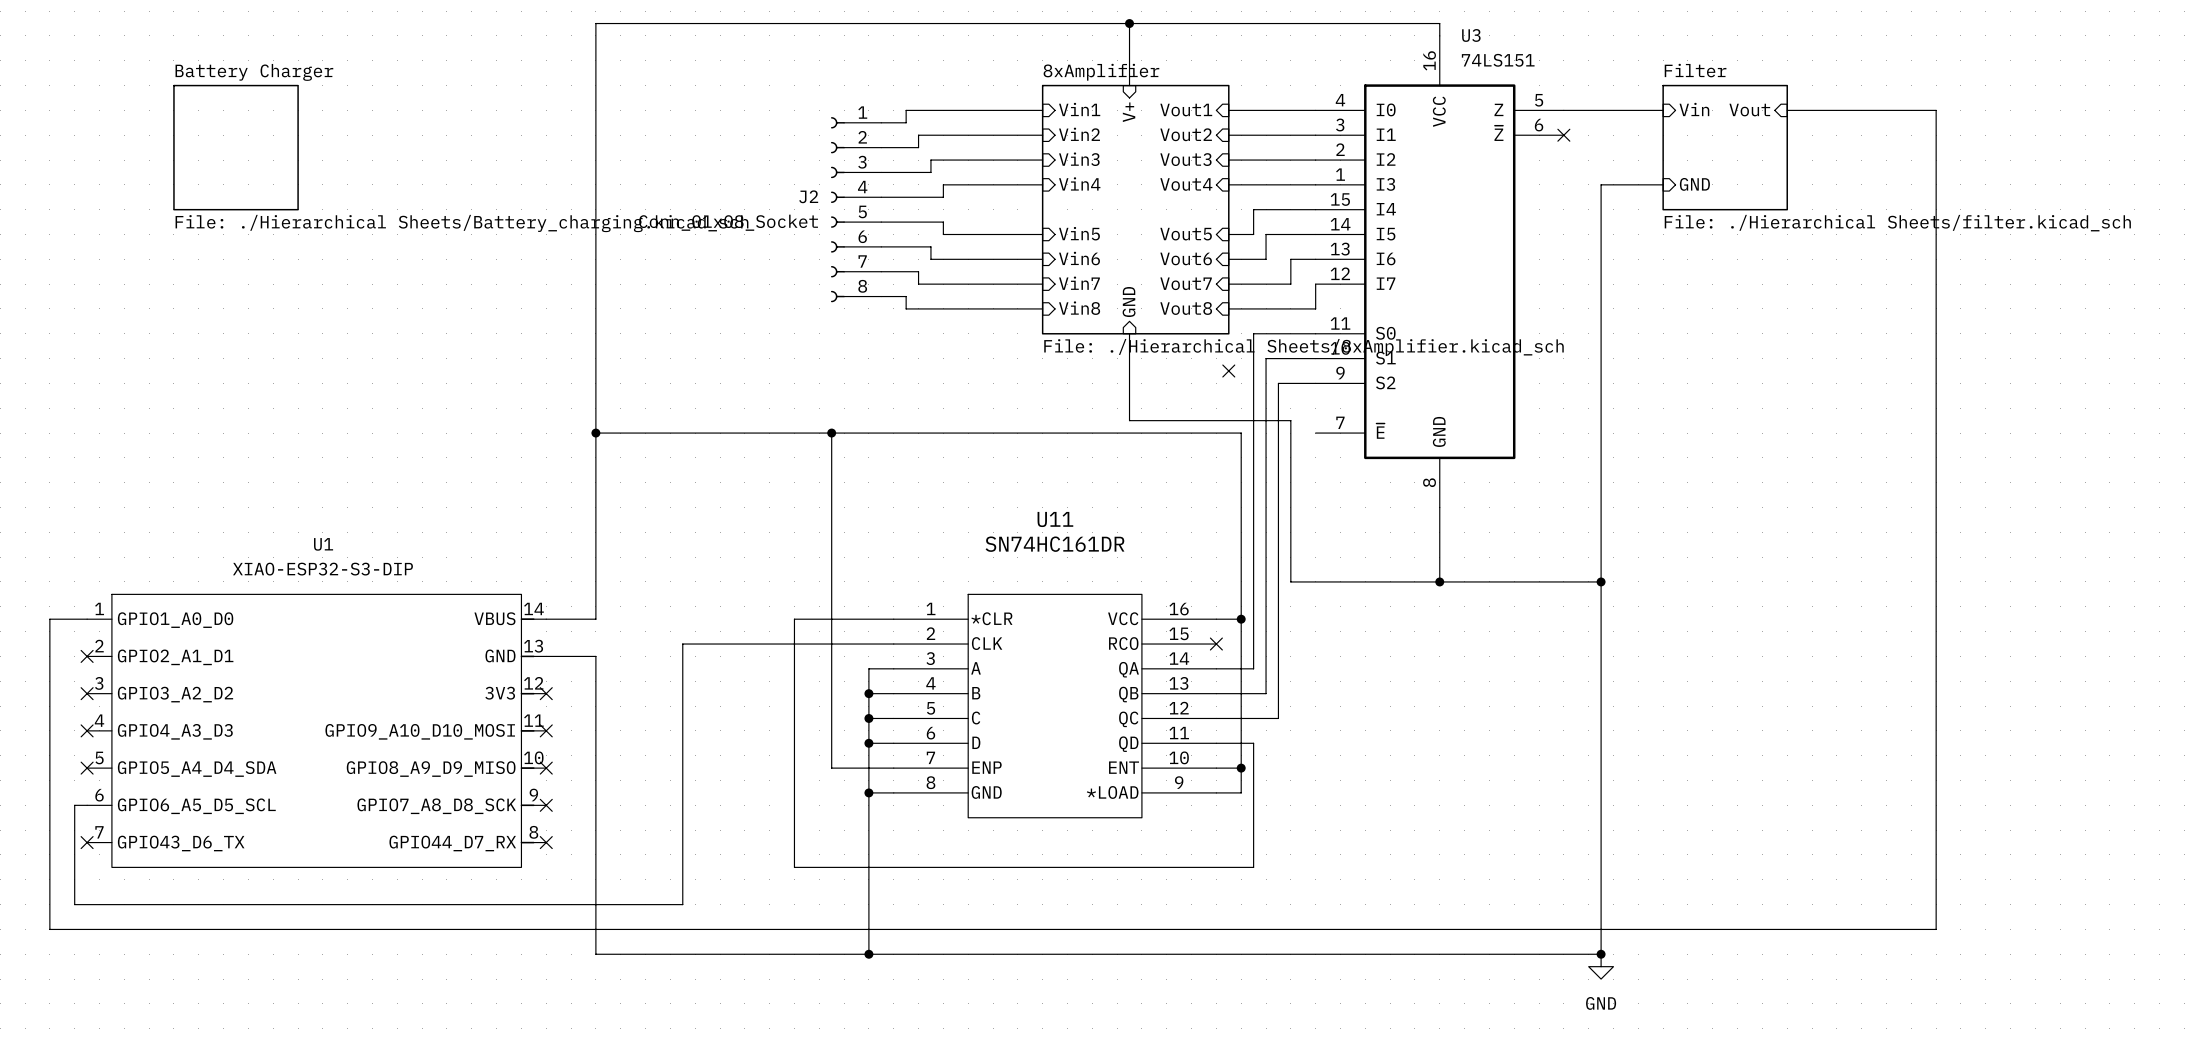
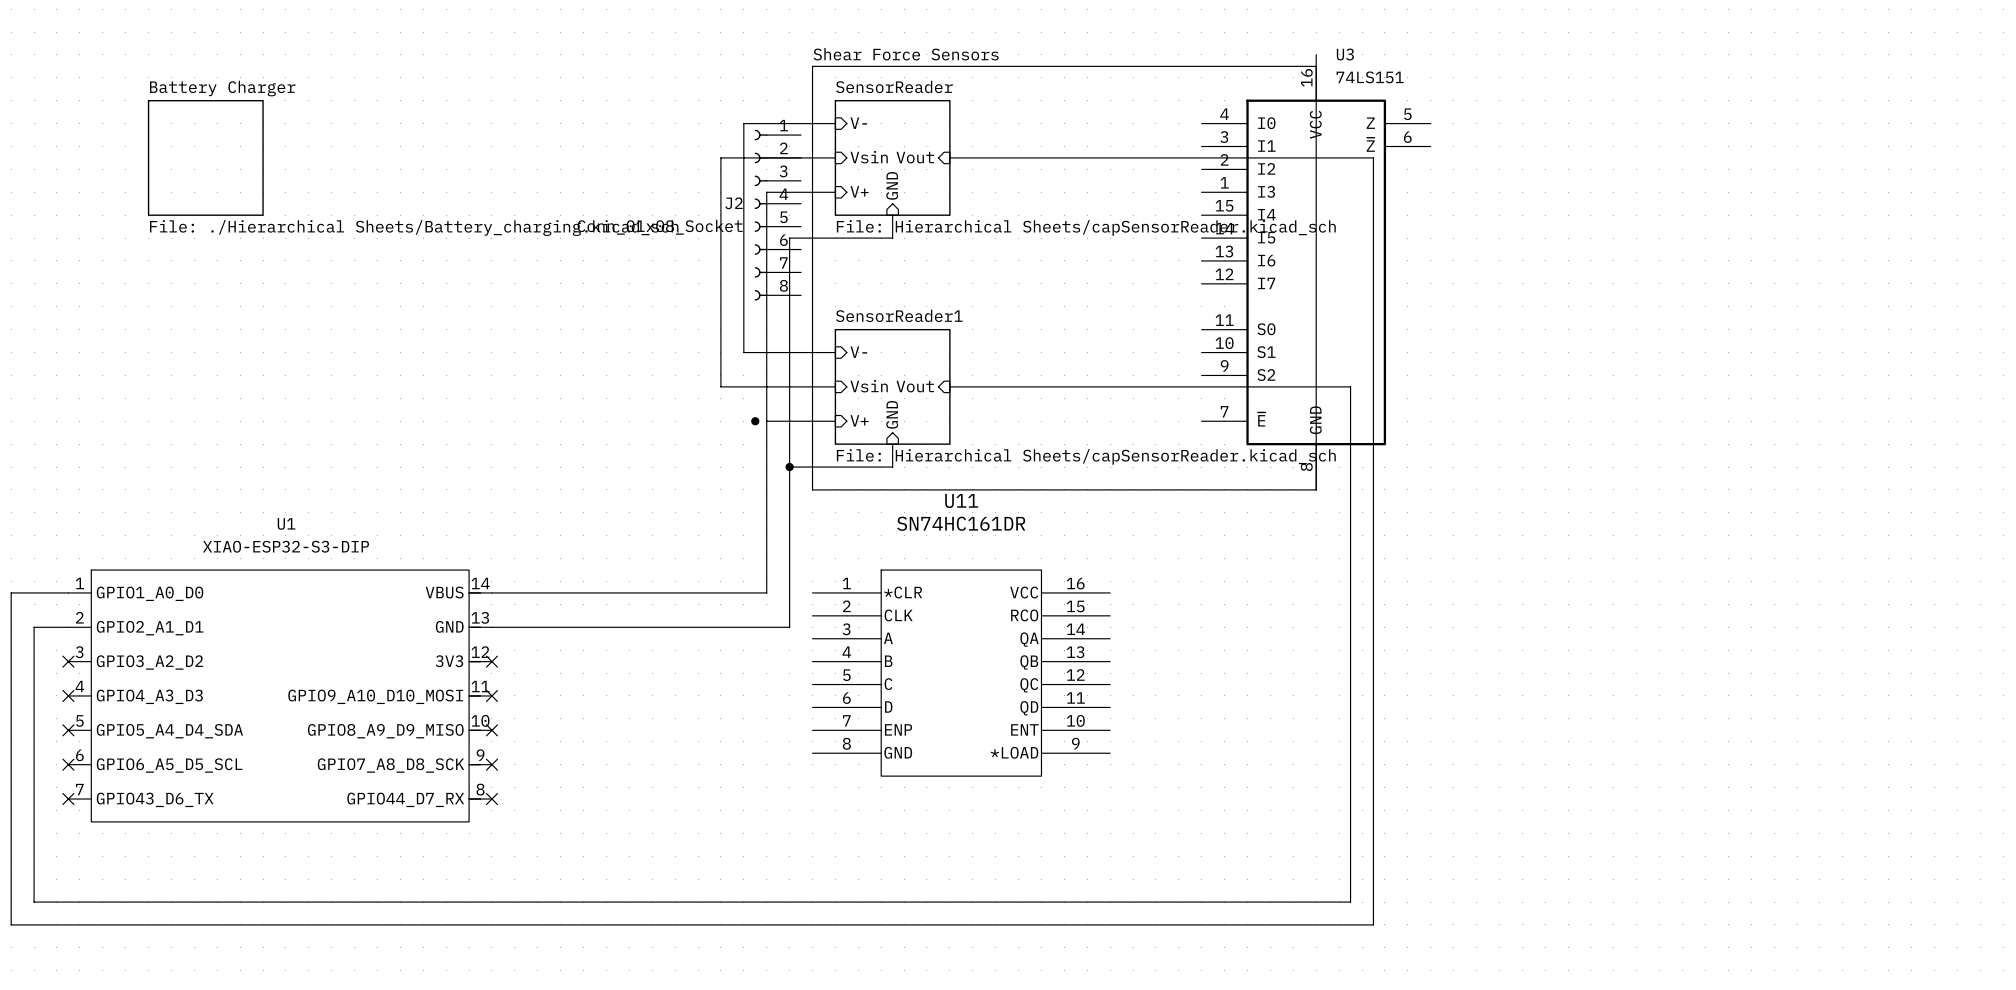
wire: (1129, 23) (1129, 85) -> none
junction: (1129, 23) -> none
text: none -> Shear Force Sensors (906, 54)
wire: (1439, 35) (1439, 23) (595, 23) (595, 619) -> none
line: none -> (812, 66) (1316, 66) (1316, 489) (812, 489) (812, 66)
sheet pin: none -> V- (858, 123)
sheet pin: Vin1 (1079, 109) -> none
sheet pin: Vin (1694, 109) -> none
wire: (906, 110) (906, 122) (881, 122) -> (823, 123) (743, 123) (743, 352) (835, 352)
wire: (918, 110) (1042, 110) -> none
sheet pin: Vout1 (1186, 110) -> none
wire: (1228, 110) (1315, 110) -> none
wire: (1563, 110) (1663, 110) -> none
sheet pin: Vout (1749, 110) -> none
wire: (1787, 110) (1936, 110) (1936, 929) (49, 929) -> none
sheet pin: V+ (1129, 112) -> none
sheet pin: Vin2 (1079, 134) -> none
sheet pin: Vout2 (1186, 134) -> none
wire: (1042, 135) (918, 135) (918, 147) -> none
wire: (1228, 135) (1315, 135) -> none
no-connect mark: (1563, 135) -> none
sheet pin: none -> Vsin (869, 157)
wire: none -> (801, 157) (720, 157) (720, 386) (835, 386)
sheet SensorReader: none -> File: Hierarchical Sheets/capSensorReader.kicad_sch (892, 157)
sheet pin: none -> Vout (915, 157)
wire: none -> (949, 157) (1373, 157) (1373, 924) (11, 924) (11, 592) (34, 592)
sheet Filter: File: ./Hierarchical Sheets/filter.kicad_sch (1725, 147) -> none
sheet pin: Vin3 (1079, 159) -> none
sheet pin: Vout3 (1185, 159) -> none
wire: (1042, 160) (930, 160) (930, 172) (881, 172) -> none
wire: (1228, 160) (1315, 160) -> none
sheet pin: none -> GND (892, 185)
sheet pin: Vin4 (1079, 183) -> none
sheet pin: none -> V+ (859, 191)
wire: (1042, 184) (943, 184) (943, 197) (881, 197) -> none
sheet pin: Vout4 (1186, 184) -> none
wire: (1228, 184) (1315, 184) -> none
wire: (1663, 184) (1601, 184) (1601, 954) (1476, 954) -> (949, 386) (1350, 386) (1350, 902)
sheet pin: GND (1694, 184) -> none
sheet 8xAmplifier: File: ./Hierarchical Sheets/8xAmplifier.kicad_sch (1135, 209) -> none
wire: (1315, 209) (1253, 209) (1253, 234) (1228, 234) -> none
wire: (881, 222) (943, 222) (943, 234) -> (537, 627) (789, 627) (789, 238) (858, 238)
sheet pin: Vin5 (1079, 233) -> none
wire: (980, 234) (1042, 234) -> (892, 238) (892, 215)
sheet pin: Vout5 (1186, 234) -> none
wire: (1315, 234) (1266, 234) (1266, 259) (1228, 259) -> none
wire: (881, 246) (930, 246) (930, 259) (1042, 259) -> none
sheet pin: Vin6 (1079, 258) -> none
sheet pin: Vout6 (1186, 258) -> none
wire: (1315, 259) (1290, 259) (1290, 284) (1228, 284) -> none
wire: (881, 271) (918, 271) (918, 284) (1042, 284) -> none
sheet pin: Vin7 (1079, 283) -> none
sheet pin: Vout7 (1186, 283) -> none
wire: (1315, 284) (1315, 308) (1228, 308) -> none
wire: (881, 296) (906, 296) (906, 308) (1042, 308) -> none
sheet pin: GND (1129, 302) -> none
sheet pin: Vin8 (1079, 308) -> none
sheet pin: Vout8 (1186, 308) -> none
wire: (1129, 333) (1129, 420) (1290, 420) (1290, 581) (1601, 581) -> none
wire: (1315, 333) (1253, 333) (1253, 668) (1216, 668) -> none
sheet pin: none -> V- (858, 352)
wire: (1315, 358) (1266, 358) (1266, 693) (1216, 693) -> none
no-connect mark: (1228, 371) -> none
wire: (1315, 383) (1278, 383) (1278, 718) (1216, 718) -> none
sheet pin: none -> Vsin (869, 386)
sheet SensorReader1: none -> File: Hierarchical Sheets/capSensorReader.kicad_sch (892, 386)
sheet pin: none -> Vout (915, 386)
sheet pin: none -> GND (892, 414)
sheet pin: none -> V+ (859, 420)
wire: (595, 433) (844, 433) -> none
junction: (595, 433) -> none
wire: (831, 433) (831, 768) (893, 768) -> none
wire: (918, 433) (1241, 433) (1241, 792) (1216, 792) -> none
wire: none -> (892, 444) (892, 467) (789, 467)
junction: none -> (789, 467)
wire: (1439, 507) (1439, 581) -> none
junction: (1439, 581) -> none
junction: (1601, 581) -> none
wire: (49, 619) (49, 656) -> (68, 627) (34, 627)
wire: (794, 619) (794, 867) (1253, 867) (1253, 743) (1216, 743) -> (720, 592) (537, 592)
wire: (844, 619) (893, 619) -> (766, 592) (766, 192) (835, 192)
wire: (1216, 619) (1241, 619) -> none
junction: (1241, 619) -> none
wire: (893, 644) (682, 644) (682, 904) (74, 904) (74, 805) (87, 805) -> none
no-connect mark: (1216, 644) -> none
no-connect mark: (87, 656) -> none
wire: (595, 656) (595, 954) -> (34, 879) (34, 902) (537, 902)
wire: (893, 668) (868, 668) (868, 954) -> none
wire: (868, 693) (893, 693) -> none
junction: (868, 693) -> none
wire: (868, 718) (893, 718) -> none
junction: (868, 718) -> none
wire: (868, 743) (893, 743) -> none
junction: (868, 743) -> none
wire: (1216, 768) (1241, 768) -> none
junction: (1241, 768) -> none
wire: (868, 792) (893, 792) -> none
junction: (868, 792) -> none
no-connect mark: none -> (68, 764)
junction: (868, 954) -> none
junction: (1601, 954) -> none
power symbol: GND (1601, 966) -> none

